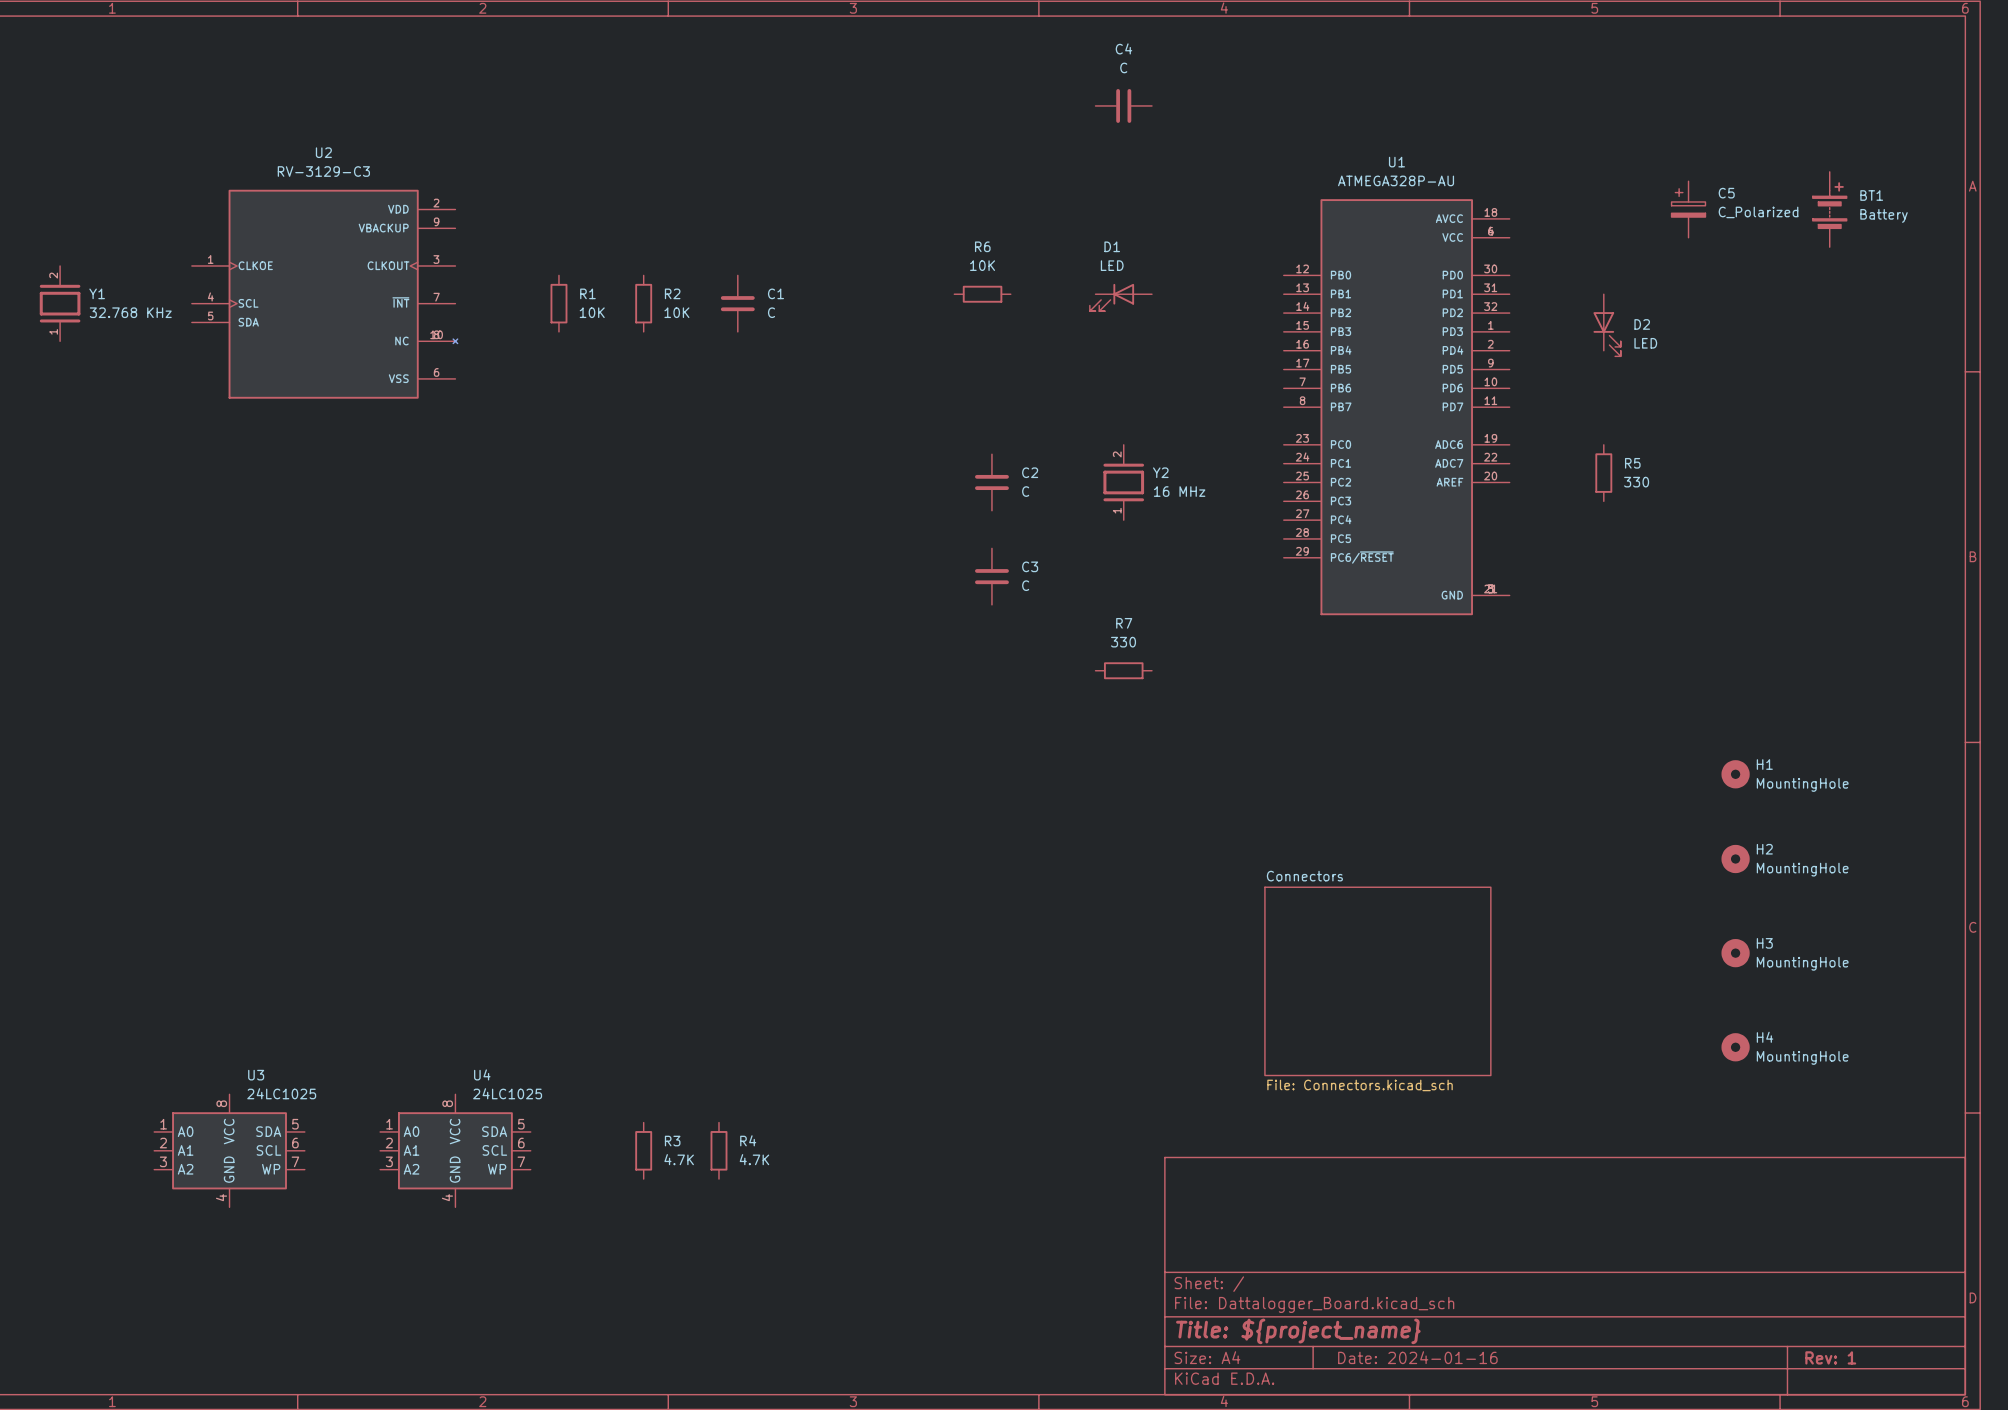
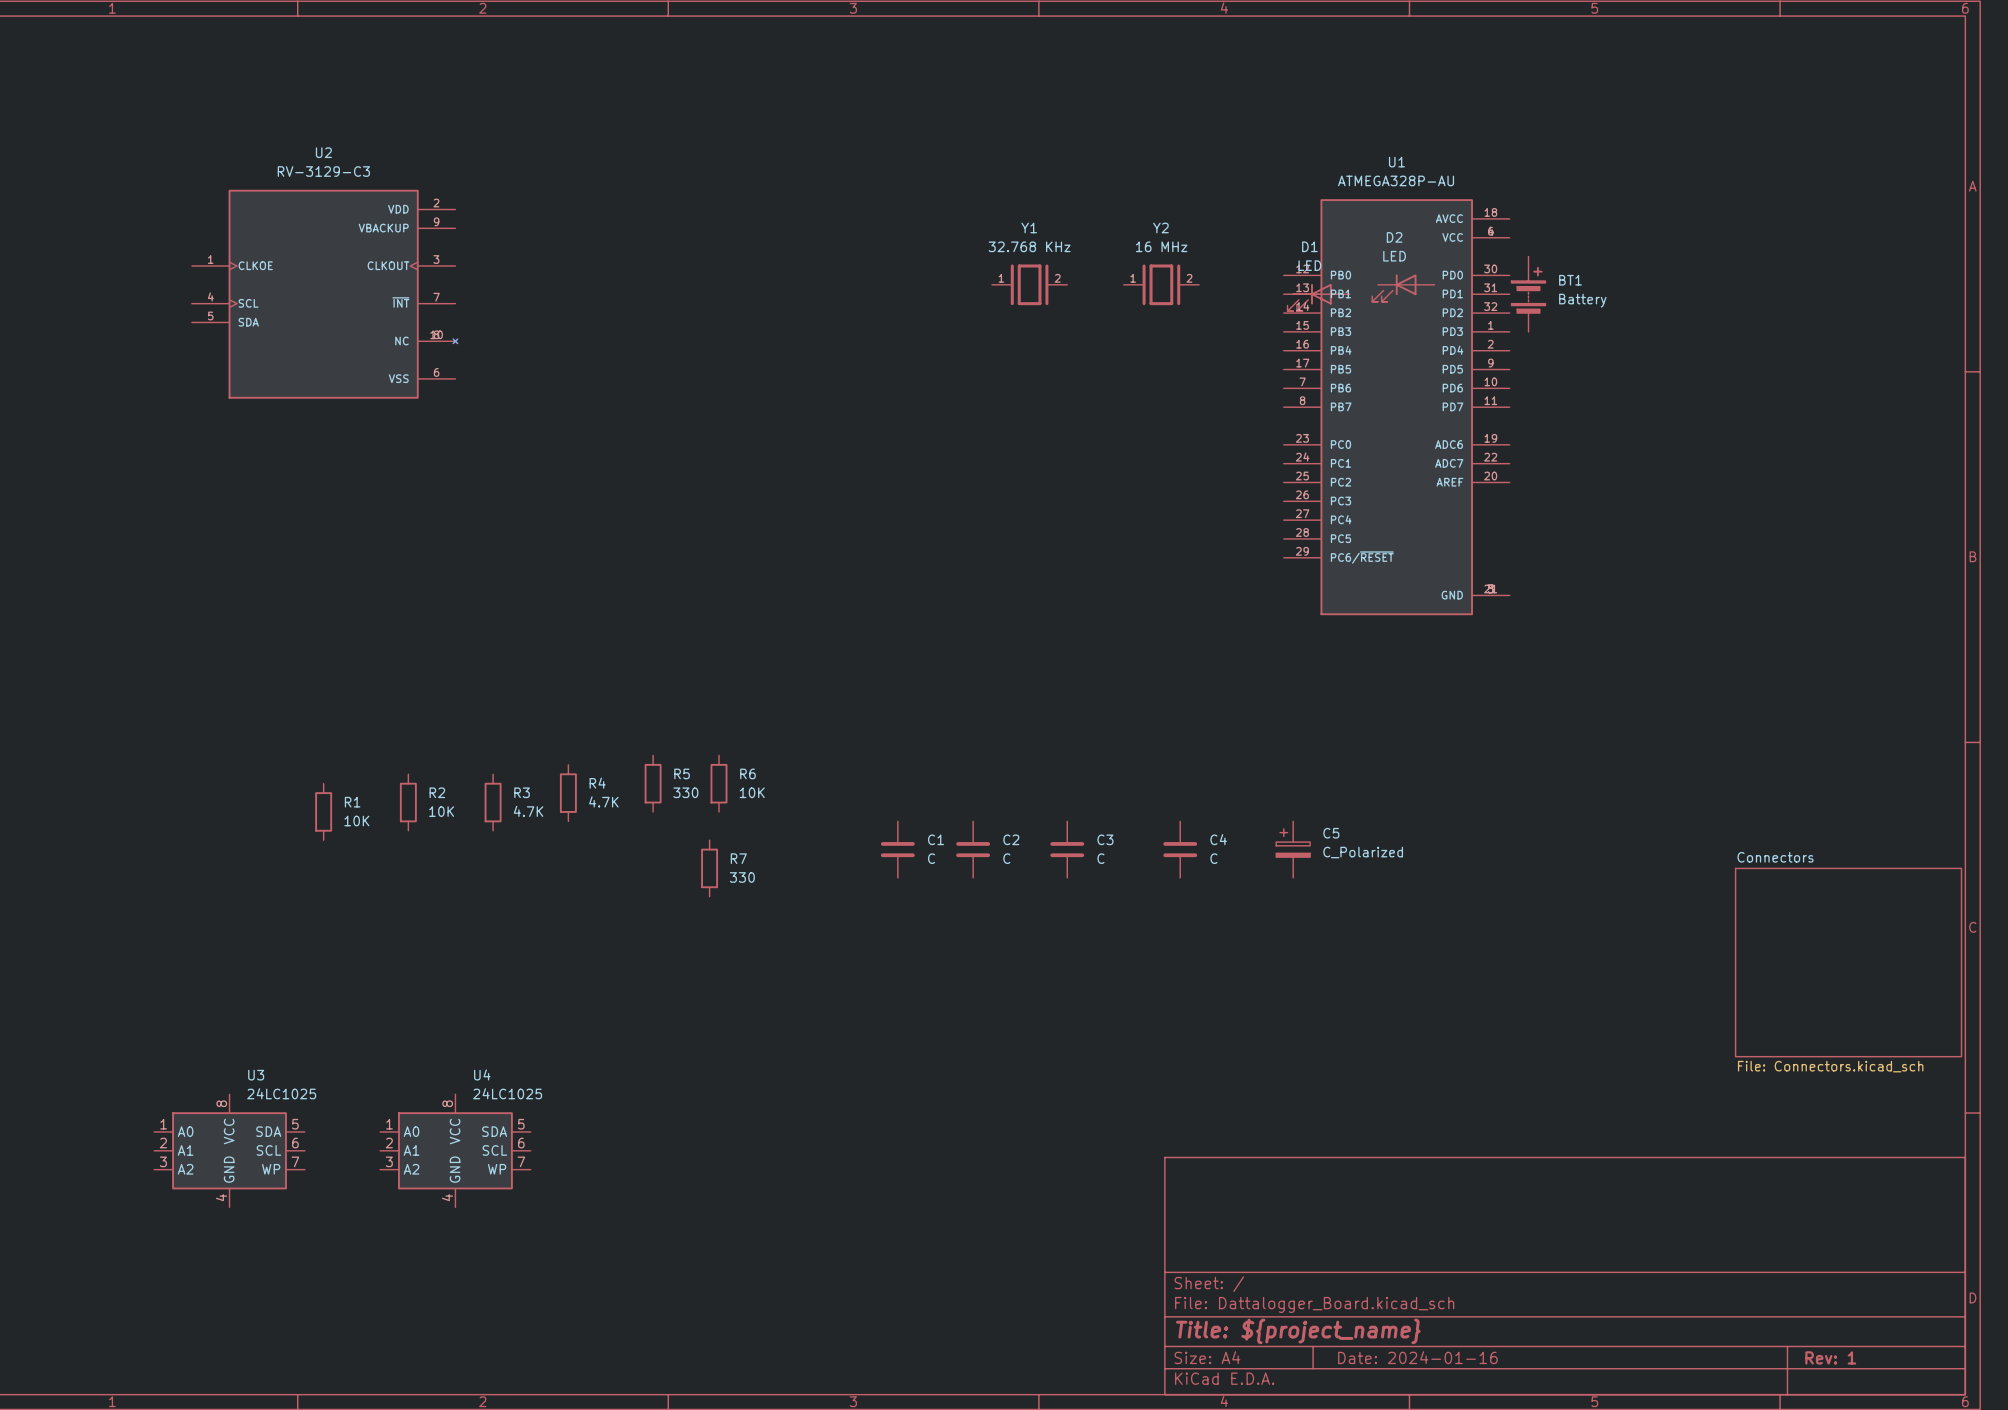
C4 name position: C4 (1123, 48) -> C4 (1218, 839)
C4 rotation: 0° (1123, 105) -> 90° clockwise (1180, 849)
C4 position: (1123, 105) -> (1180, 849)
C5 position: (1688, 209) -> (1293, 849)
BT1 position: (1829, 209) -> (1528, 294)
R6 name position: R6 (982, 246) -> R6 (747, 773)
Y1 name position: Y1 (97, 293) -> Y1 (1029, 227)
R6 rotation: 0° (982, 294) -> 90° clockwise (718, 783)
R6 position: (982, 294) -> (718, 783)
D1 position: (1120, 297) -> (1318, 297)
Y1 rotation: 0° (60, 303) -> 90° clockwise (1029, 284)
Y1 position: (60, 303) -> (1029, 284)
R1 position: (558, 303) -> (323, 811)
R2 position: (643, 303) -> (408, 802)
C1 position: (737, 303) -> (897, 849)
Y1 value position: 32.768 KHz (130, 312) -> 32.768 KHz (1029, 246)
D2 name position: D2 (1642, 324) -> D2 (1394, 237)
D2 position: (1607, 325) -> (1403, 288)
D2 rotation: 0° (1607, 334) -> 90° clockwise (1394, 288)
D2 value position: LED (1645, 343) -> LED (1394, 256)
Y2 name position: Y2 (1160, 472) -> Y2 (1160, 227)
R5 position: (1603, 473) -> (653, 783)
C2 position: (991, 482) -> (973, 849)
Y2 rotation: 0° (1123, 482) -> 90° clockwise (1161, 284)
Y2 position: (1123, 482) -> (1161, 284)
Y2 value position: 16 MHz (1179, 491) -> 16 MHz (1161, 246)
C3 position: (991, 576) -> (1067, 849)
R7 name position: R7 (1124, 623) -> R7 (738, 858)
R7 rotation: 0° (1123, 670) -> 90° clockwise (709, 868)
R7 position: (1123, 670) -> (709, 868)
H1: MountingHole (1735, 774) -> none
H2: MountingHole (1735, 859) -> none
H3: MountingHole (1735, 953) -> none
sheet Connectors: none -> File: Connectors.kicad_sch (1848, 962)
sheet Connectors: File: Connectors.kicad_sch (1377, 981) -> none
H4: MountingHole (1735, 1047) -> none
R3 position: (643, 1150) -> (493, 802)
R4 position: (718, 1150) -> (568, 793)

